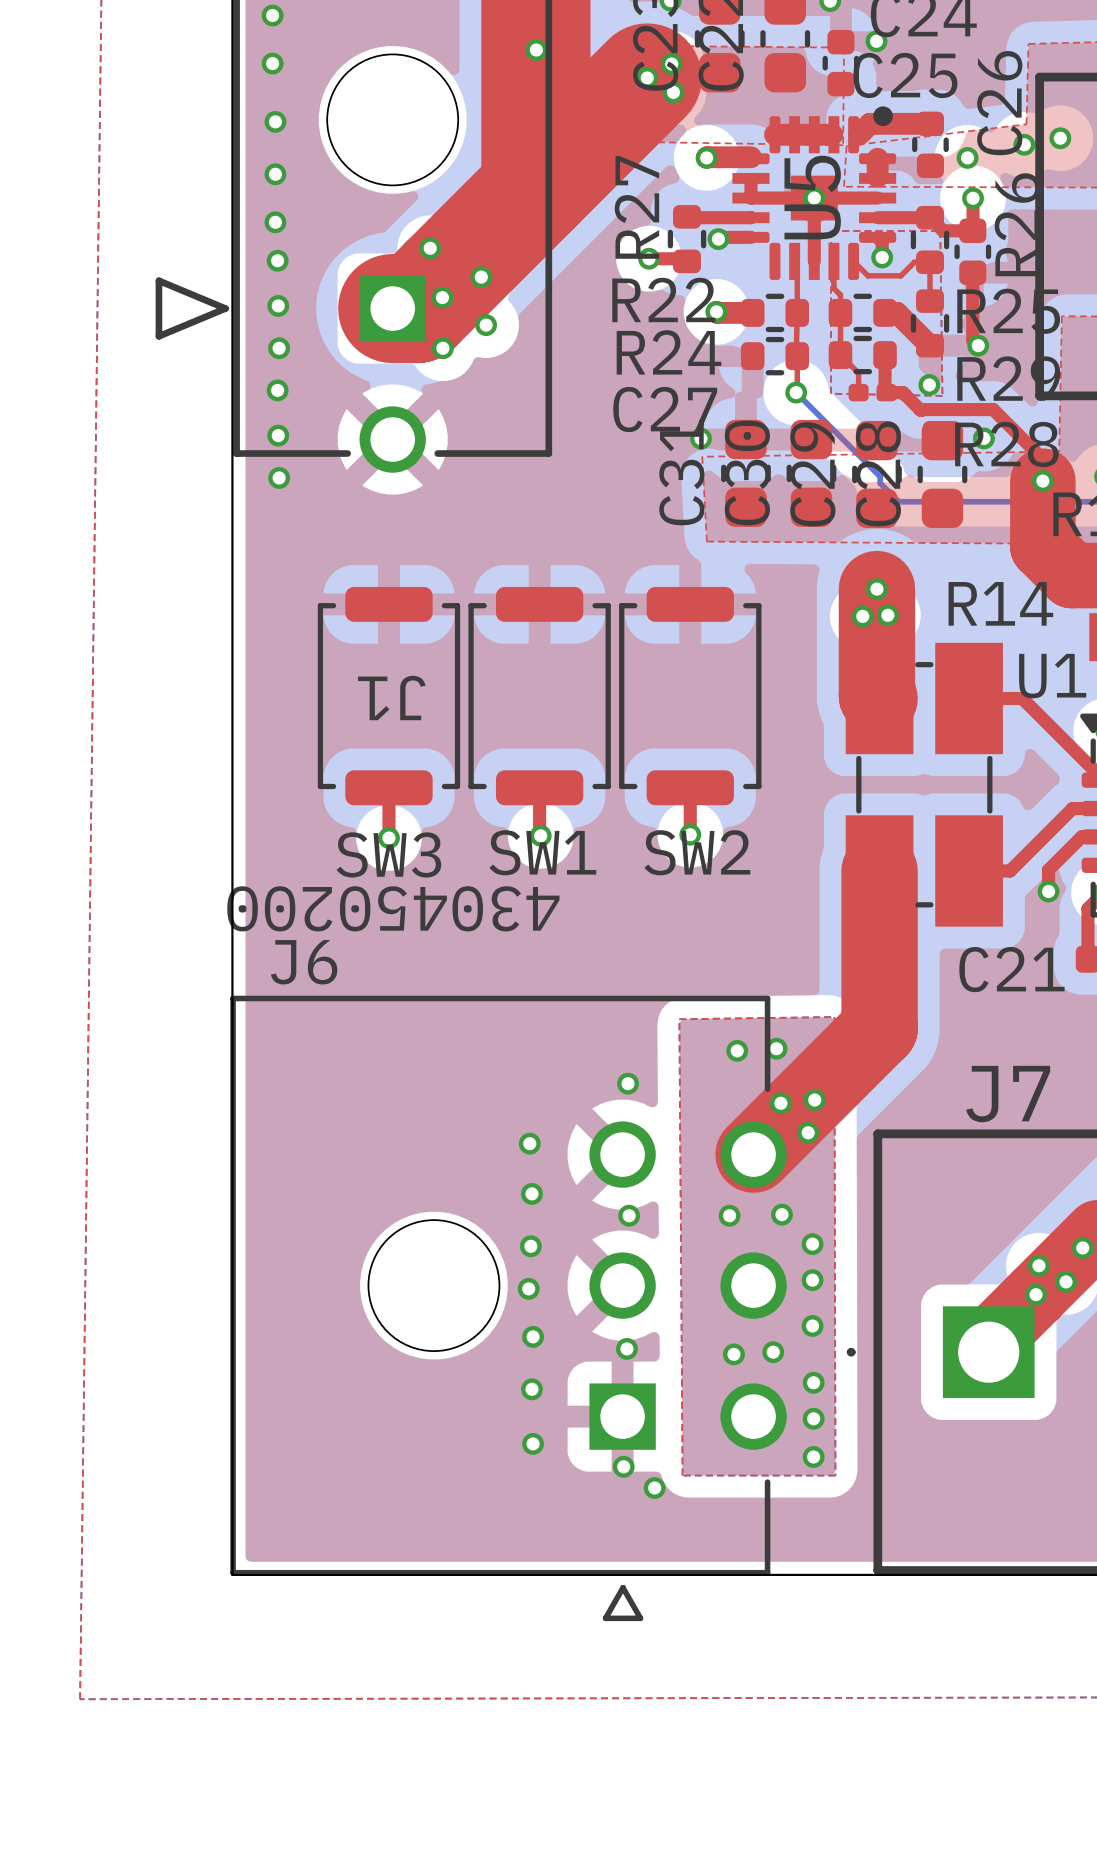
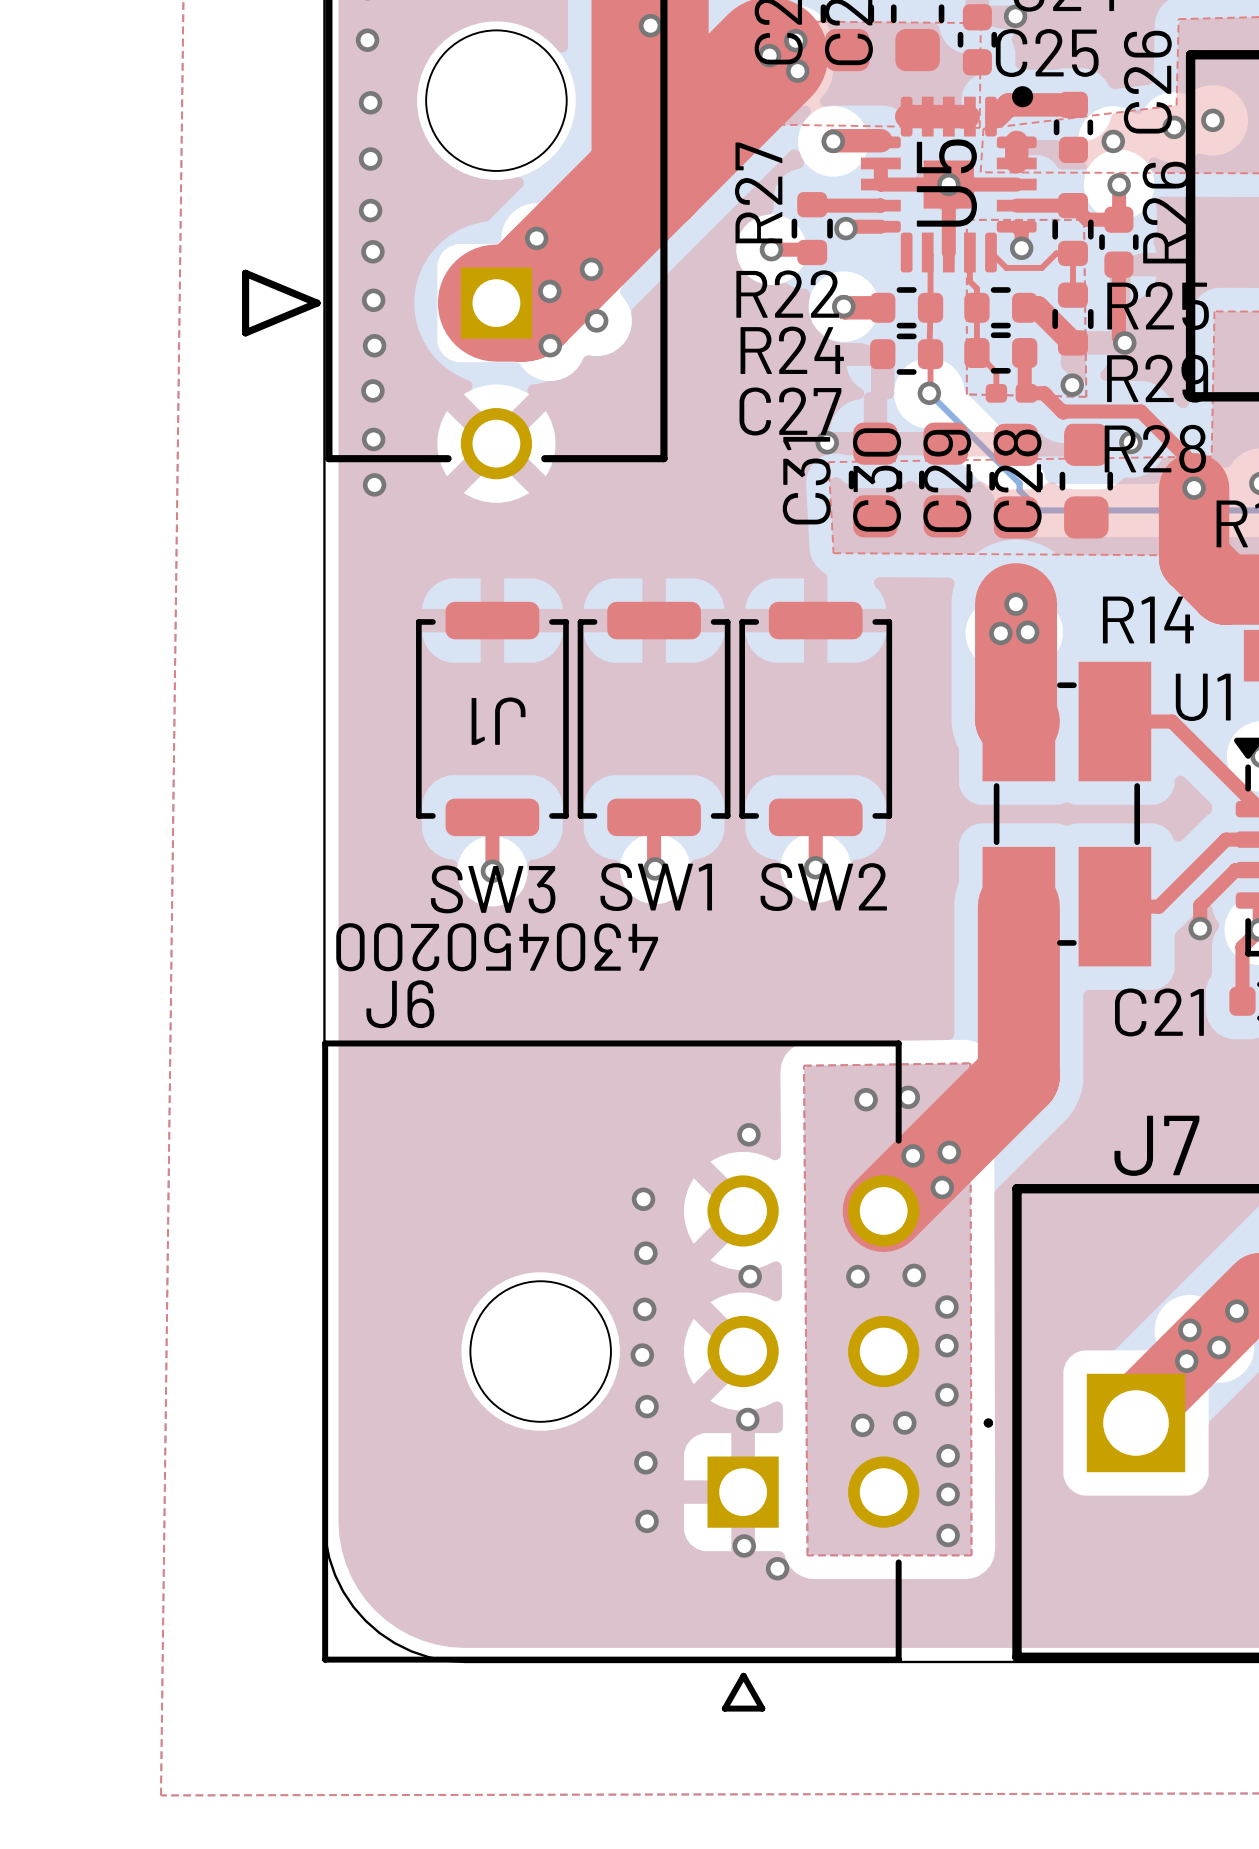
board edge: (232, 1443) (232, 1574) (363, 1574) -> (324, 1521) (329, 1557) (335, 1575) (343, 1591) (365, 1620) (394, 1643) (411, 1651) (428, 1657) (465, 1661)

